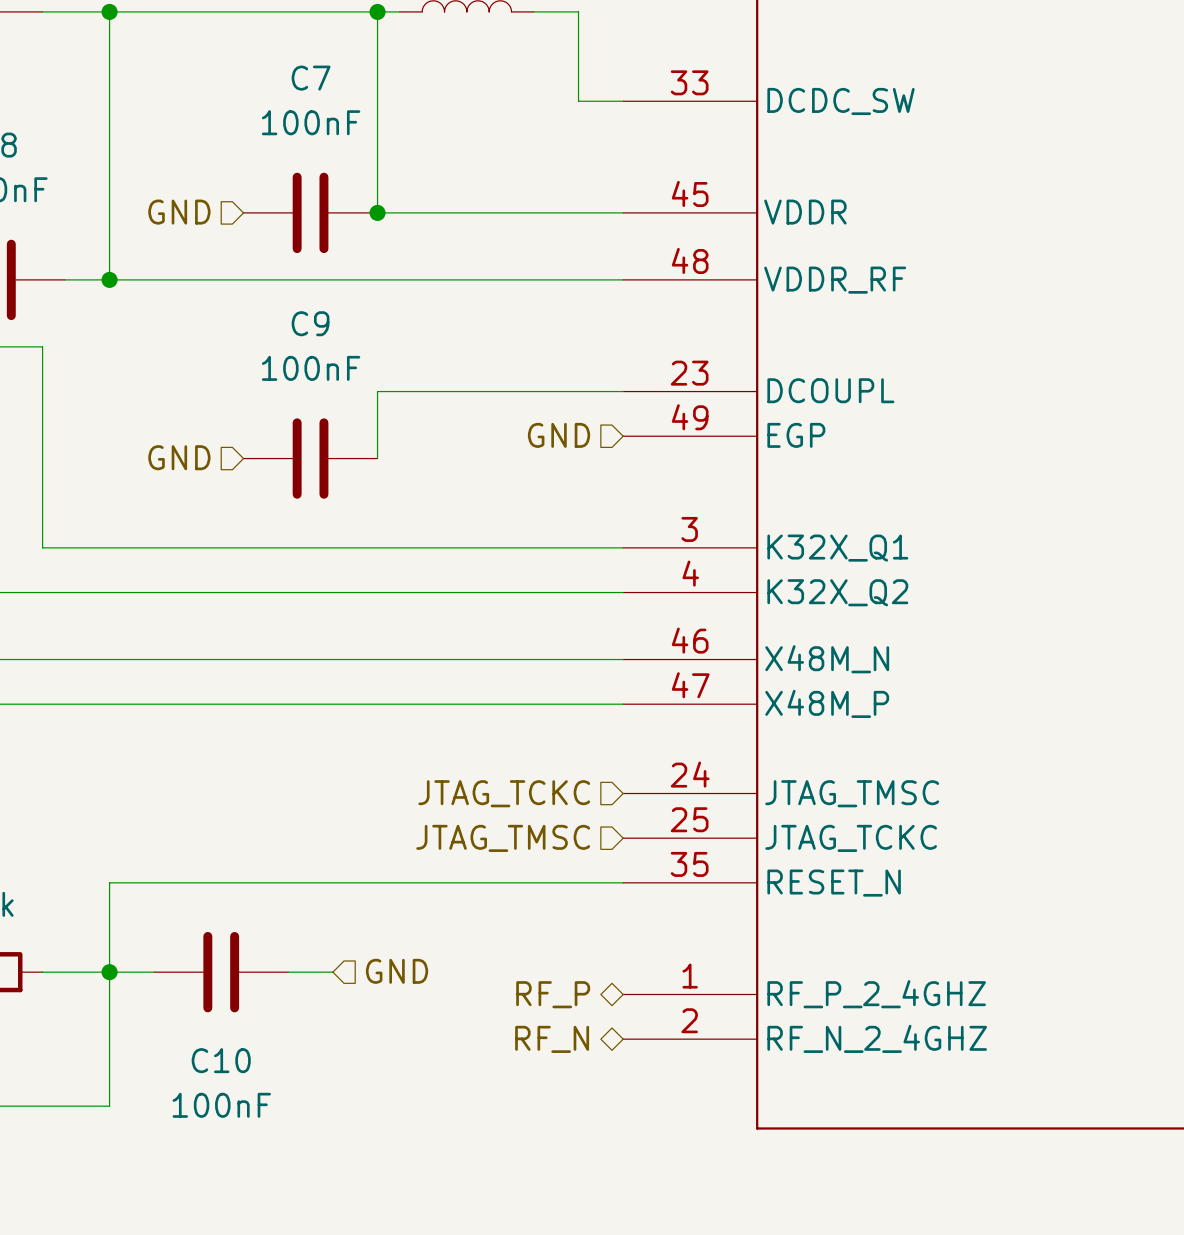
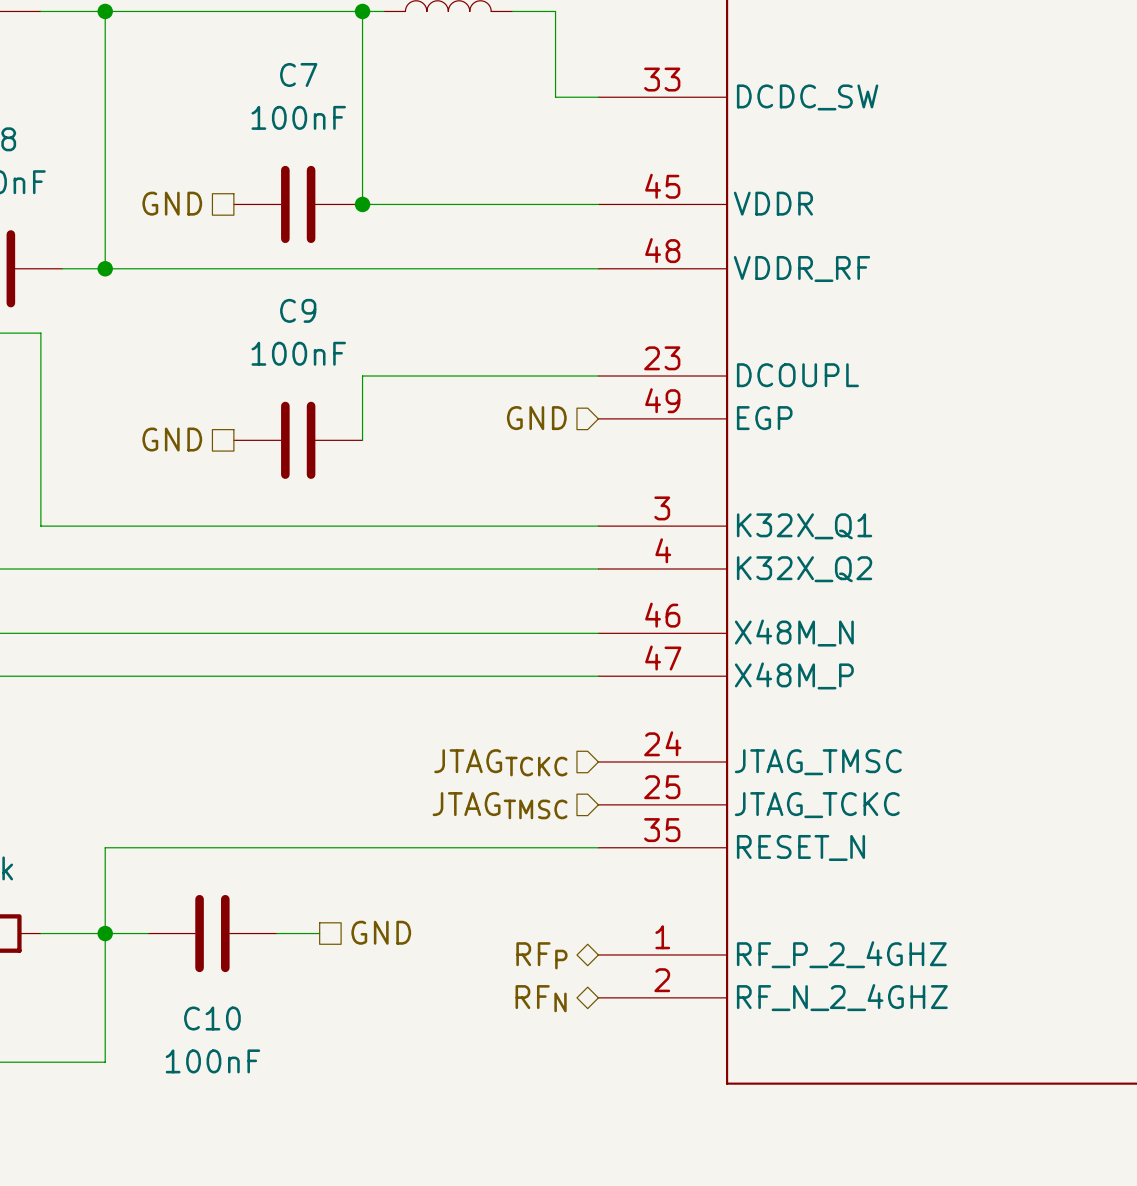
hierarchical label shape: input (179, 212) -> passive (172, 203)
hierarchical label shape: input (179, 457) -> passive (172, 439)
hierarchical label: JTAG_TCKC (504, 793) -> JTAGTCKC (500, 762)
hierarchical label: JTAG_TMSC (503, 838) -> JTAGTMSC (500, 805)
hierarchical label shape: input (397, 971) -> passive (381, 932)
hierarchical label: RF_P (553, 994) -> RFP (541, 955)
hierarchical label: RF_N (552, 1039) -> RFN (541, 998)

